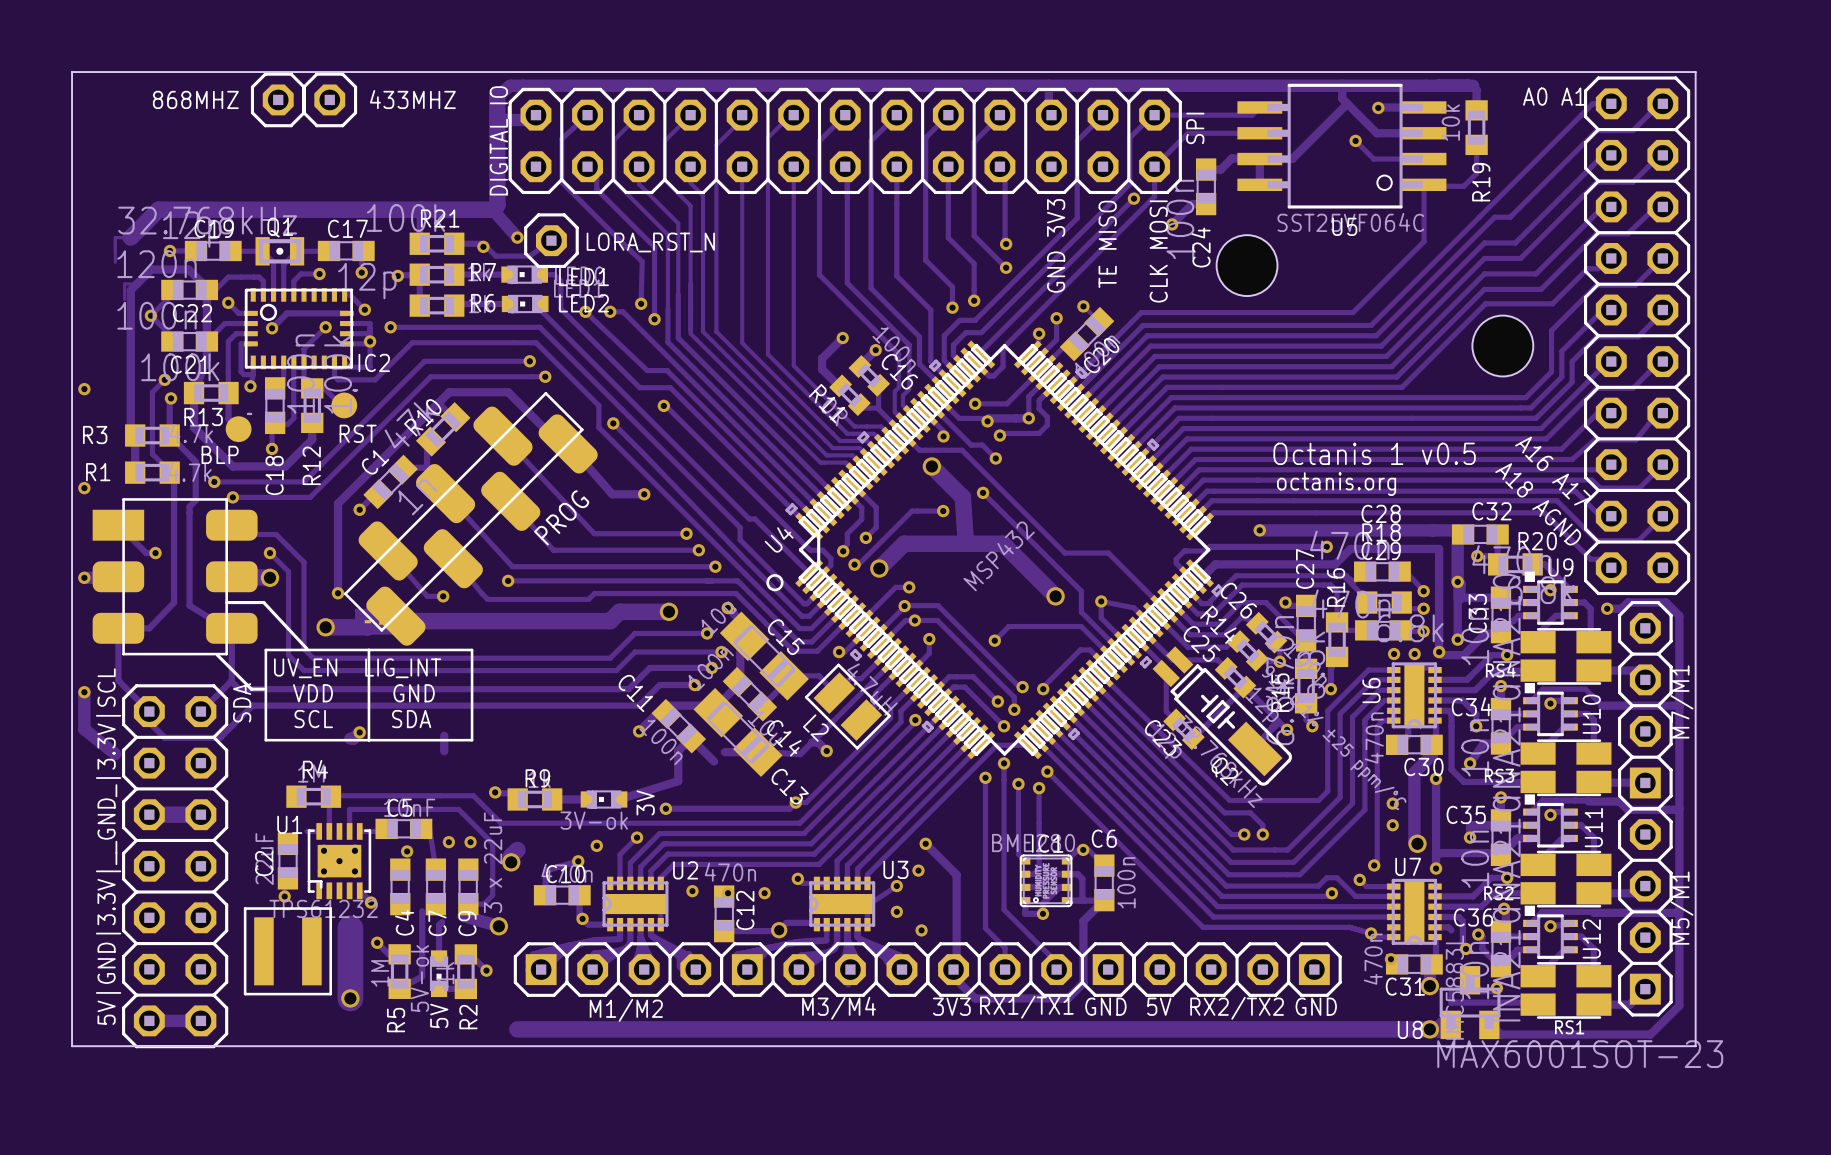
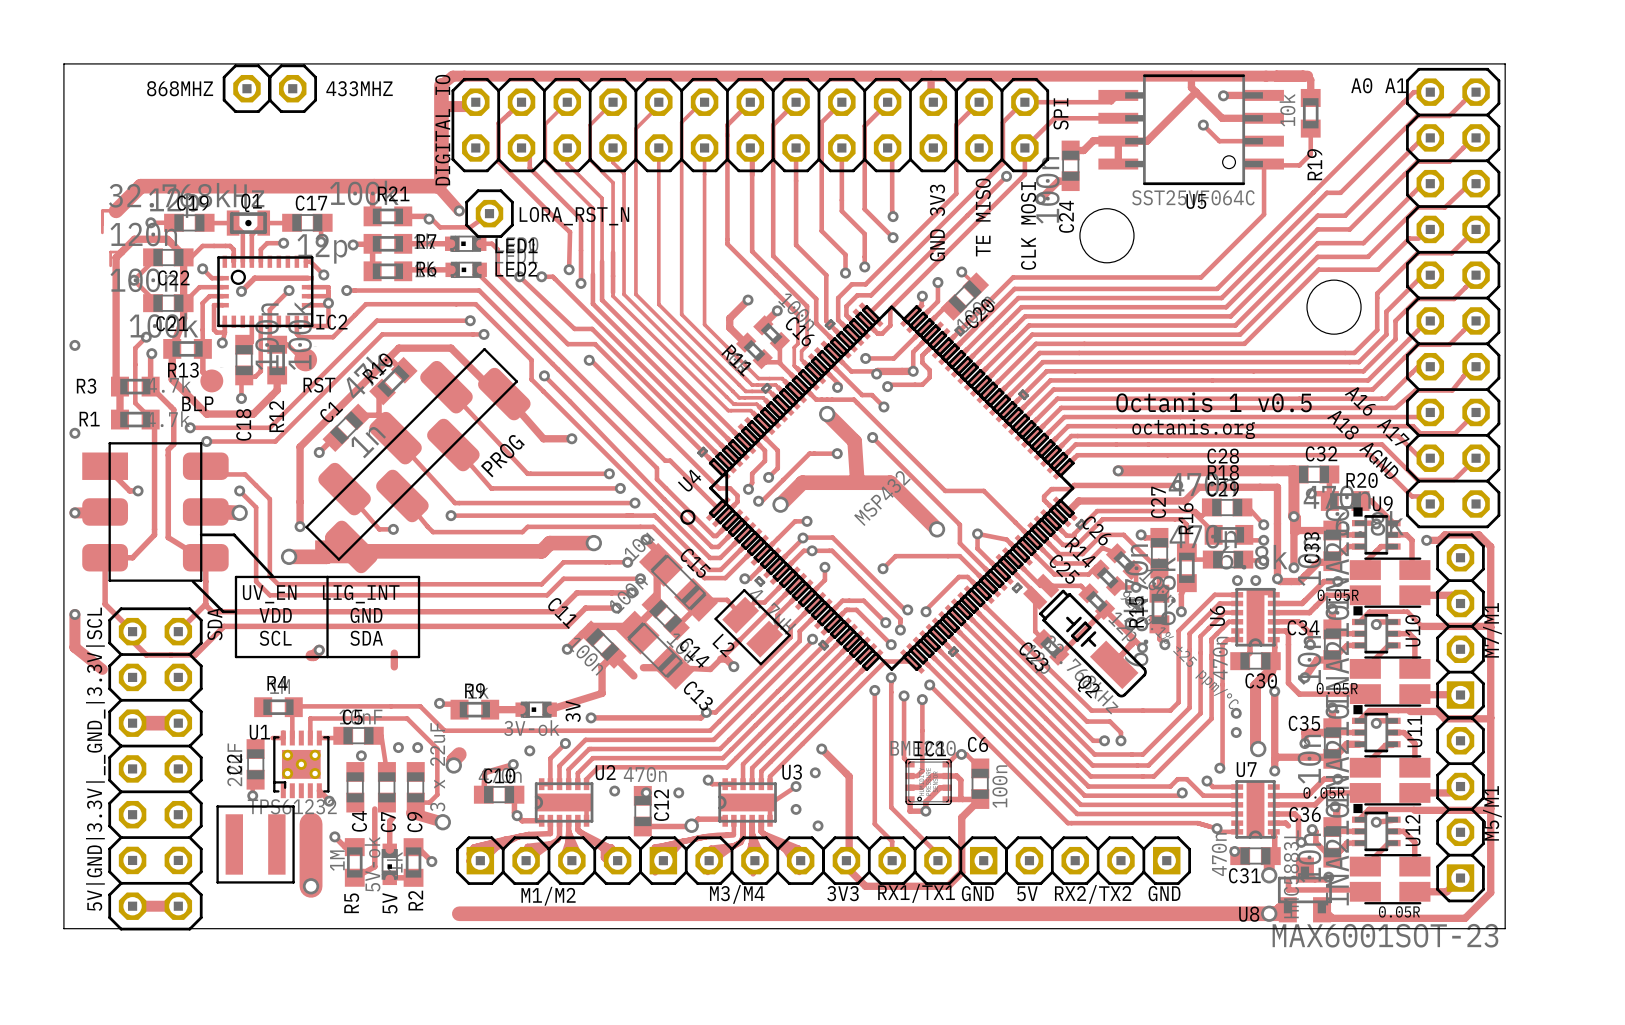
part value: RS4 (1500, 670) -> 0.05R (1338, 595)
part value: RS3 (1499, 775) -> 0.05R (1337, 688)
part value: RS2 (1498, 893) -> 0.05R (1323, 792)
part value: RS1 (1569, 1027) -> 0.05R (1399, 911)

